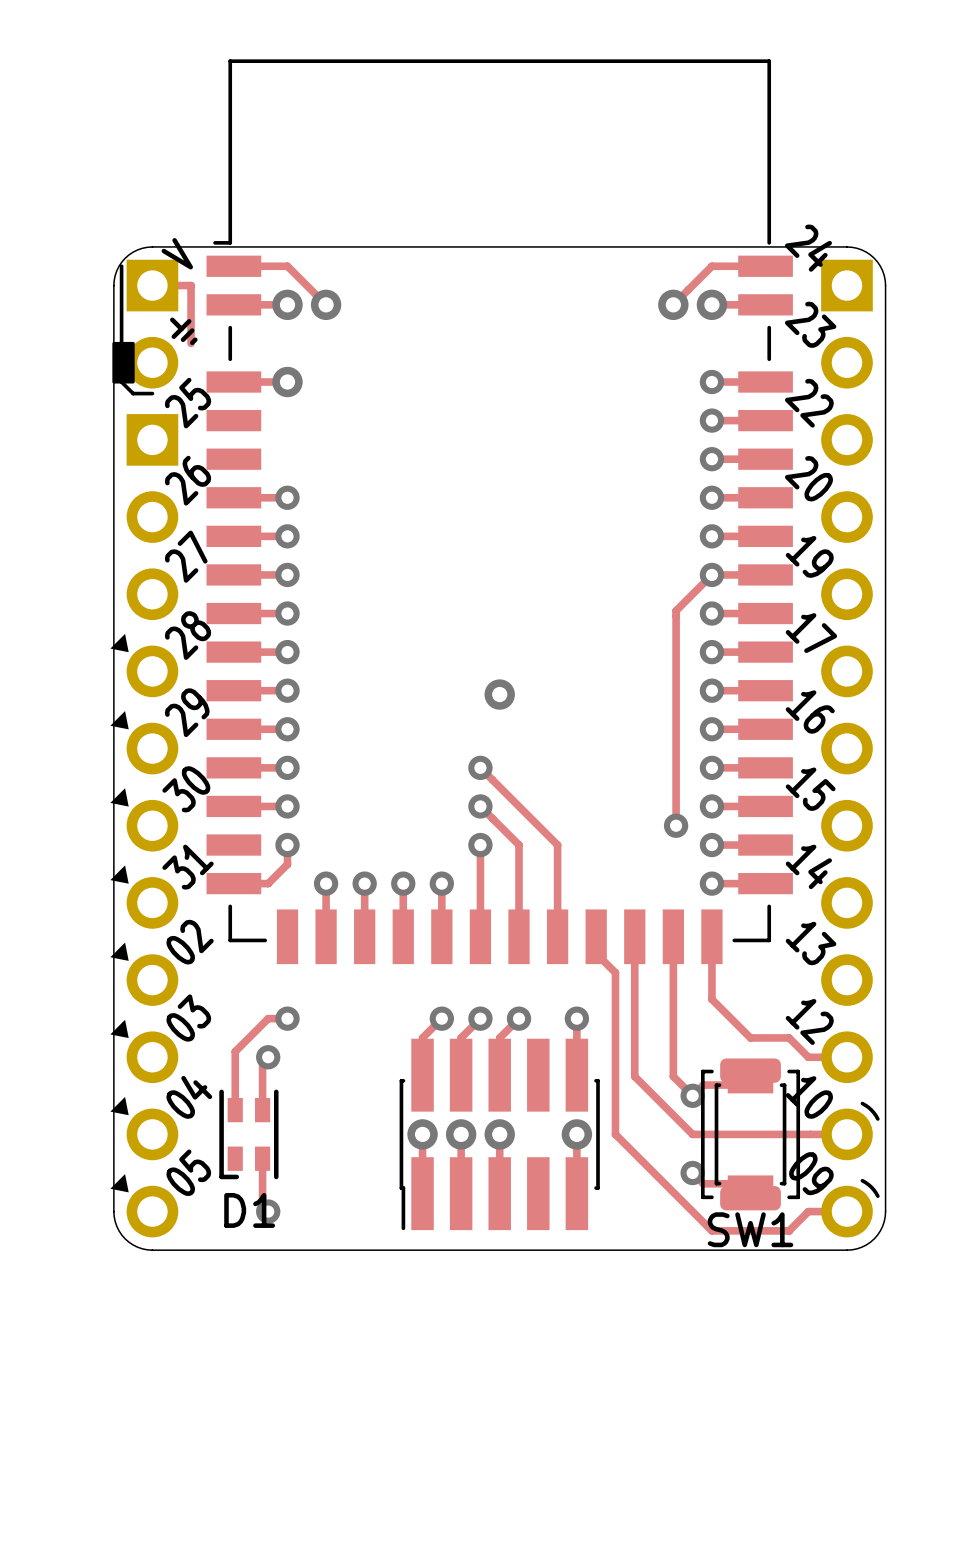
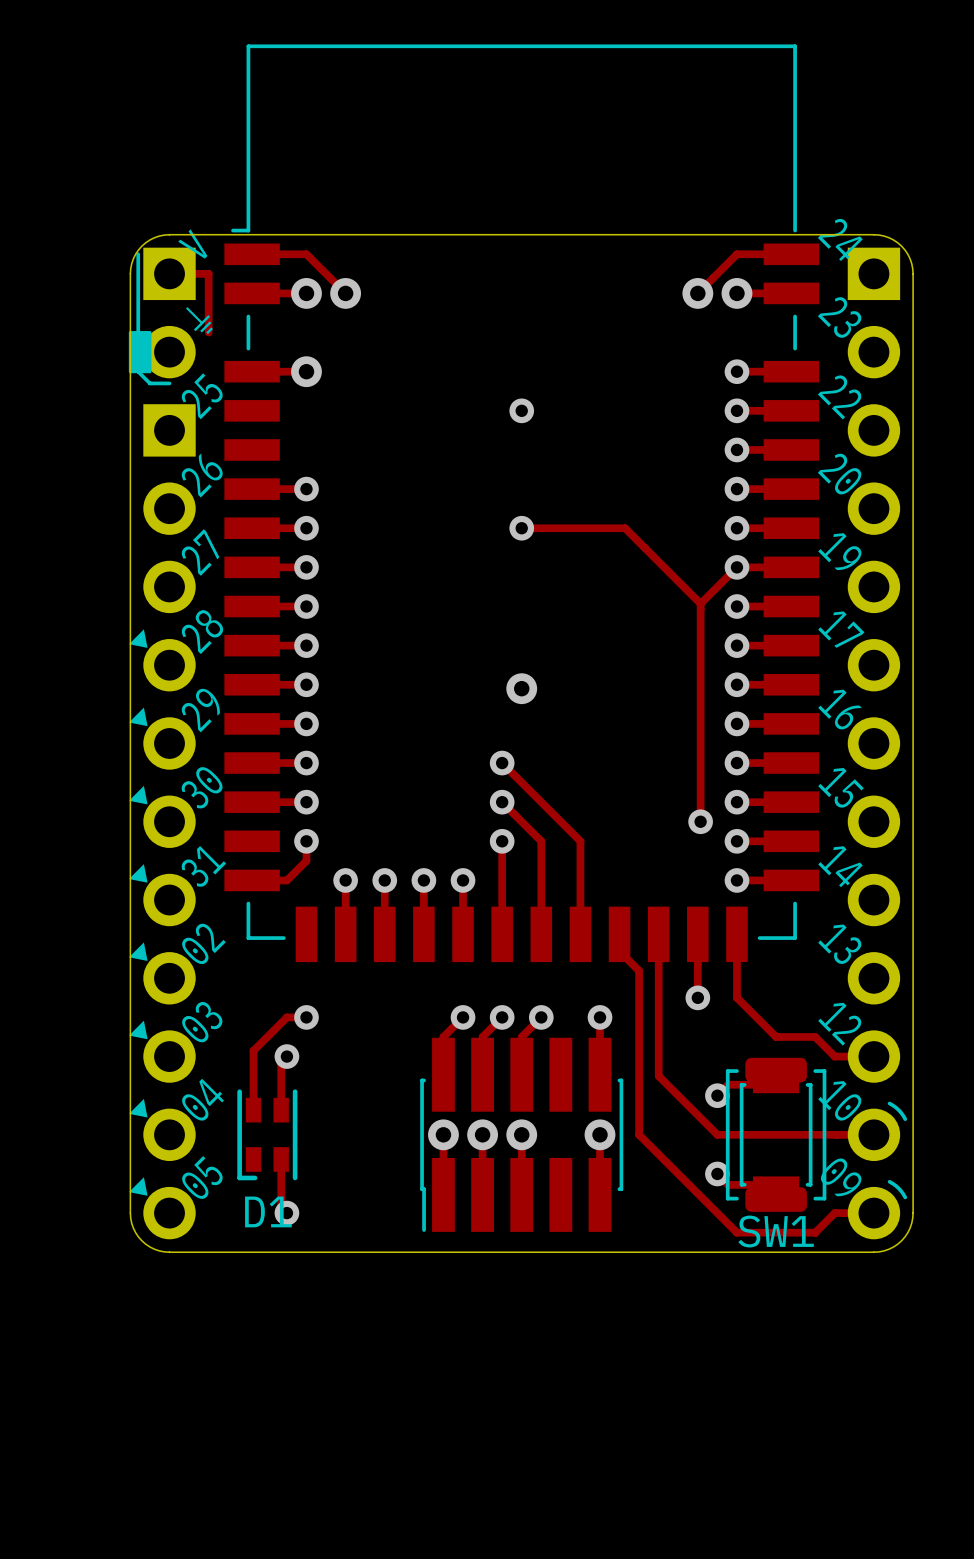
via: none -> (521, 410)
track: none -> (521, 528) (625, 528) (700, 603)
via: none -> (521, 528)
track: (673, 999) (673, 1076) (692, 1095) -> none
via: none -> (697, 997)

